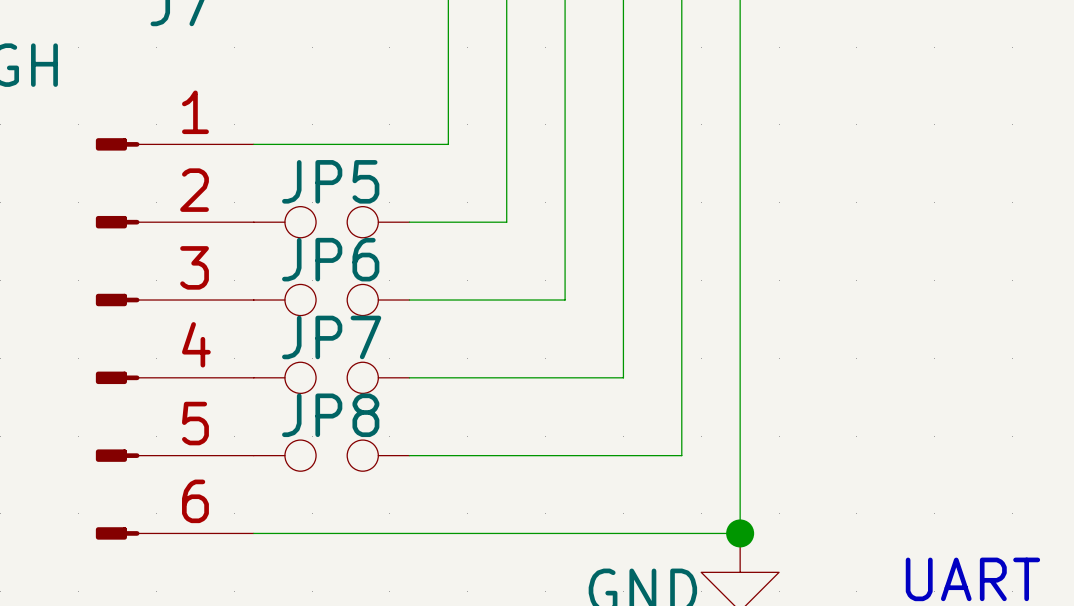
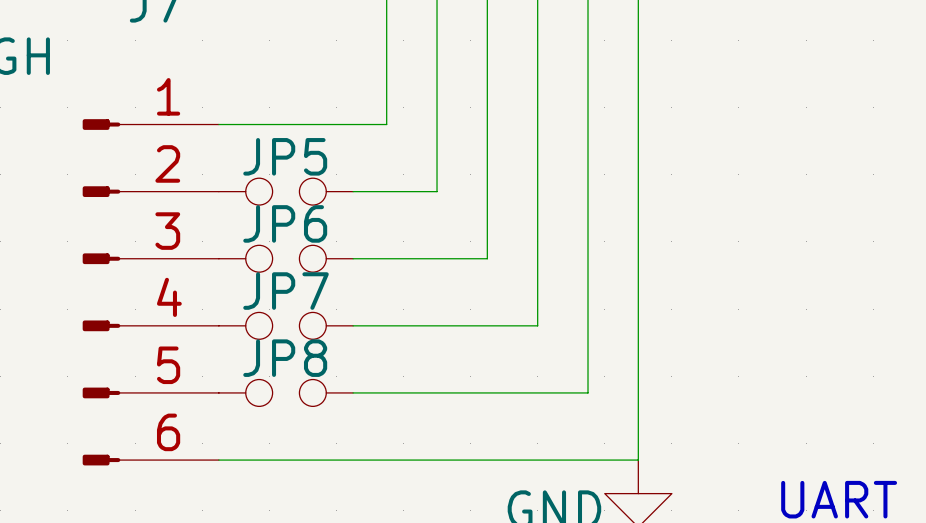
junction: (740, 533) -> none

